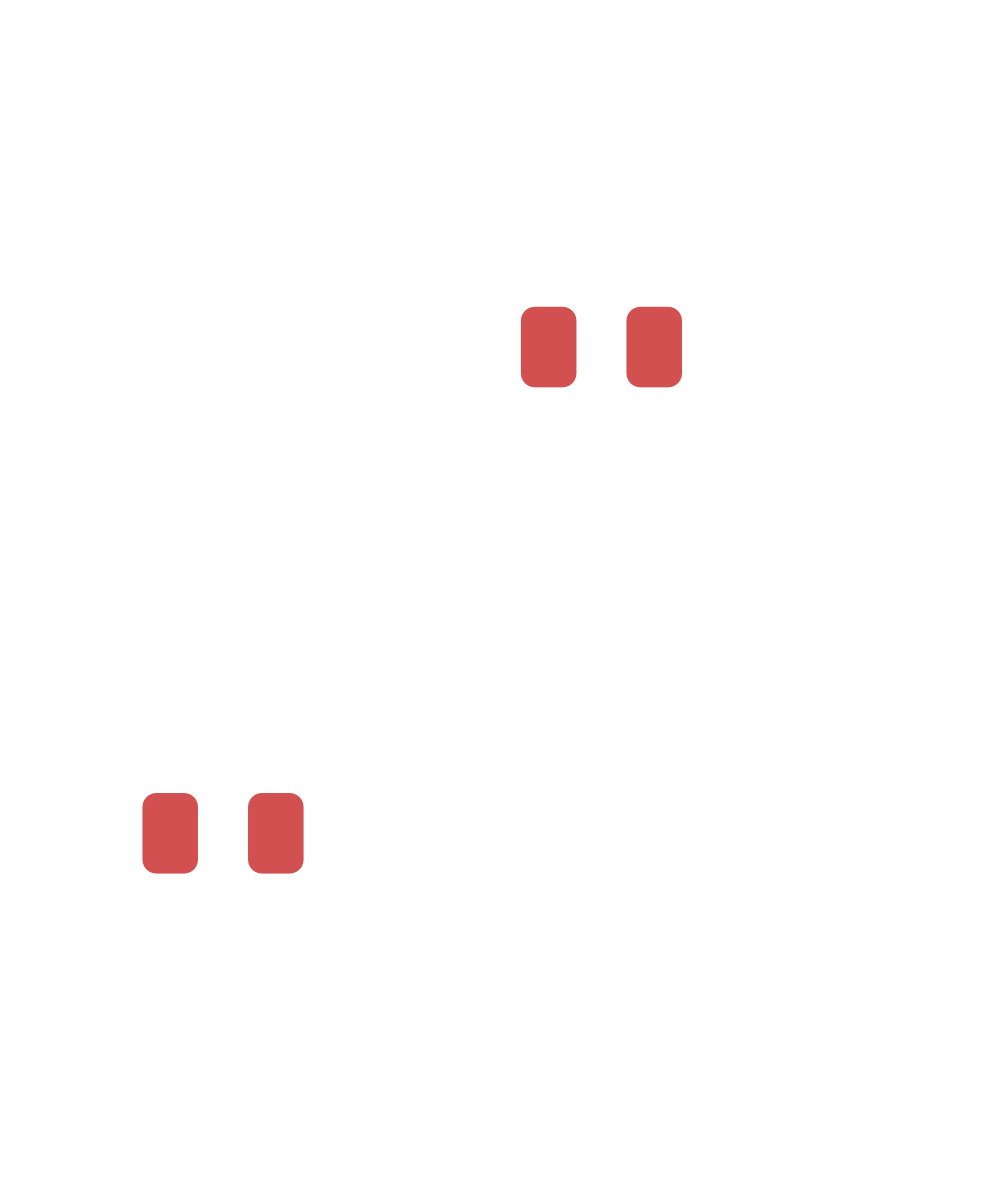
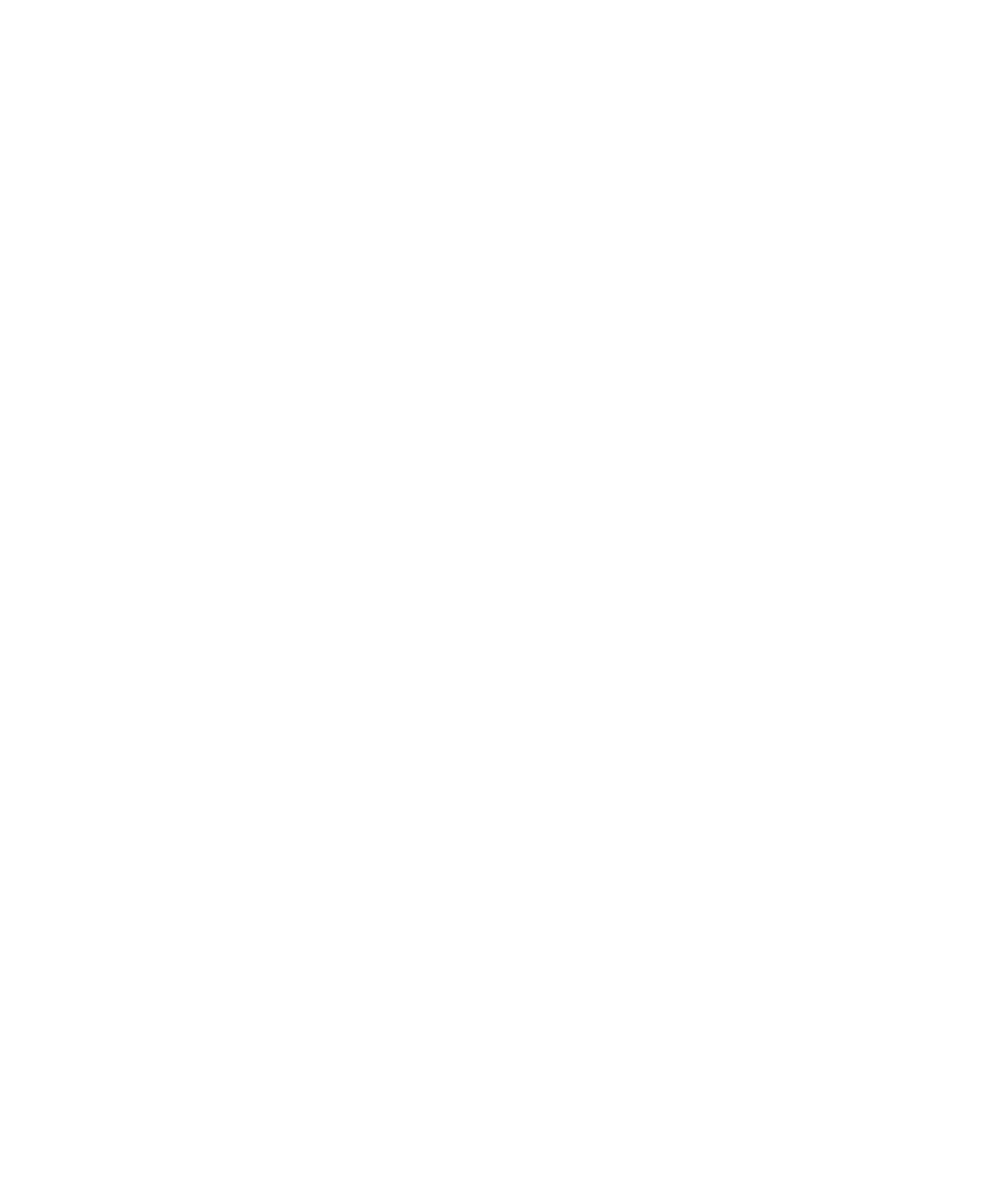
part: (601, 347) -> none
part: (223, 833) -> none

